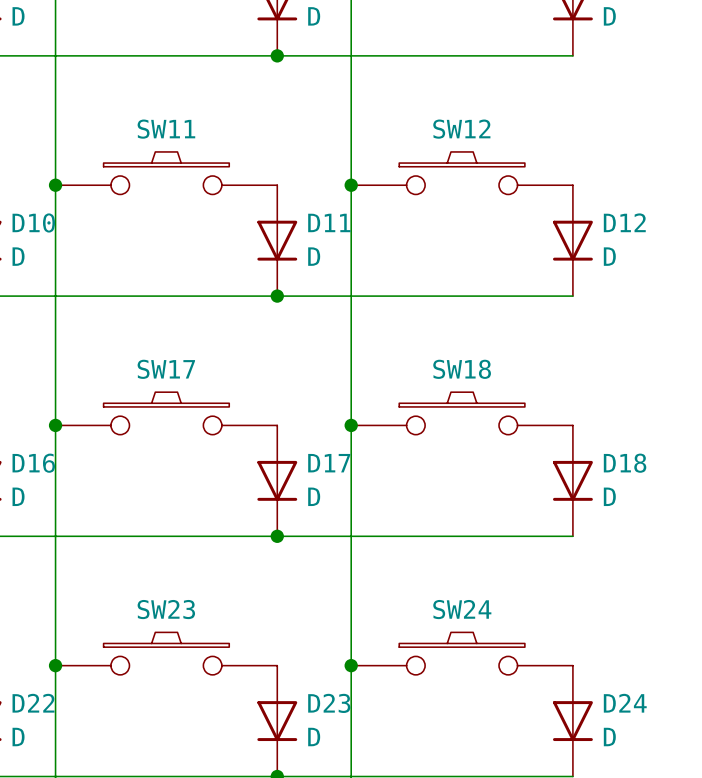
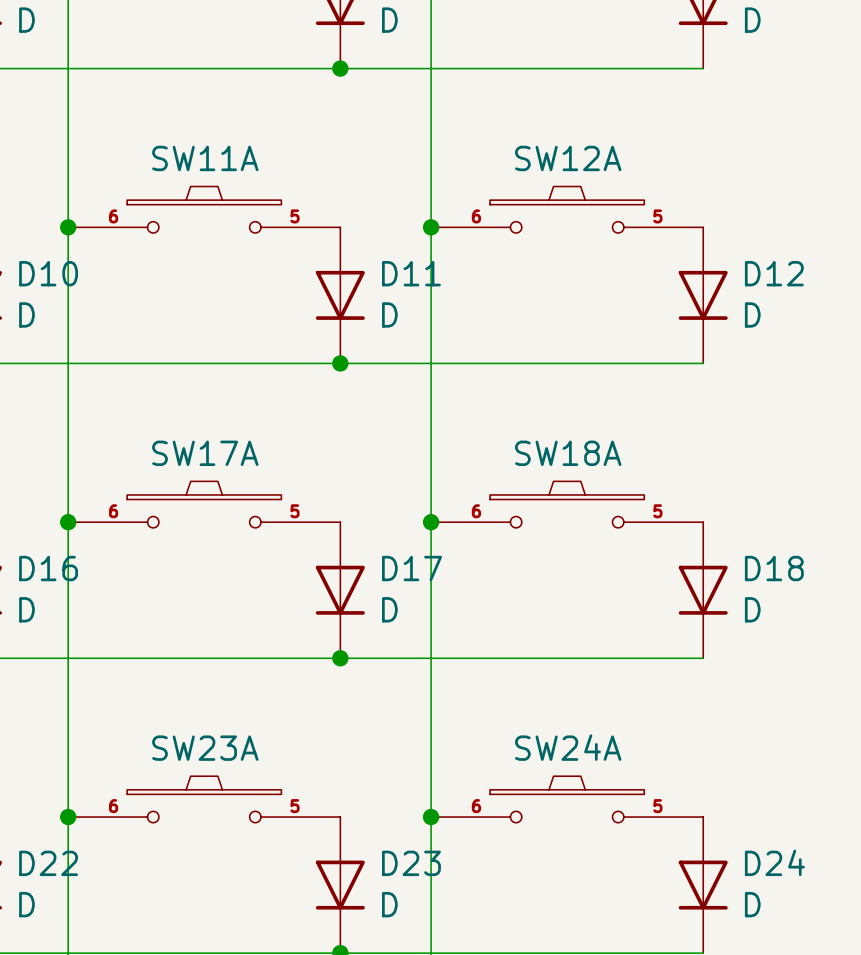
SW11A: none -> (204, 209)
SW12A: none -> (567, 209)
SW11: (166, 173) -> none
SW12: (462, 173) -> none
SW17A: none -> (204, 504)
SW18A: none -> (567, 504)
SW17: (166, 413) -> none
SW18: (462, 413) -> none
SW23A: none -> (204, 799)
SW24A: none -> (567, 799)
SW23: (166, 653) -> none
SW24: (462, 653) -> none

